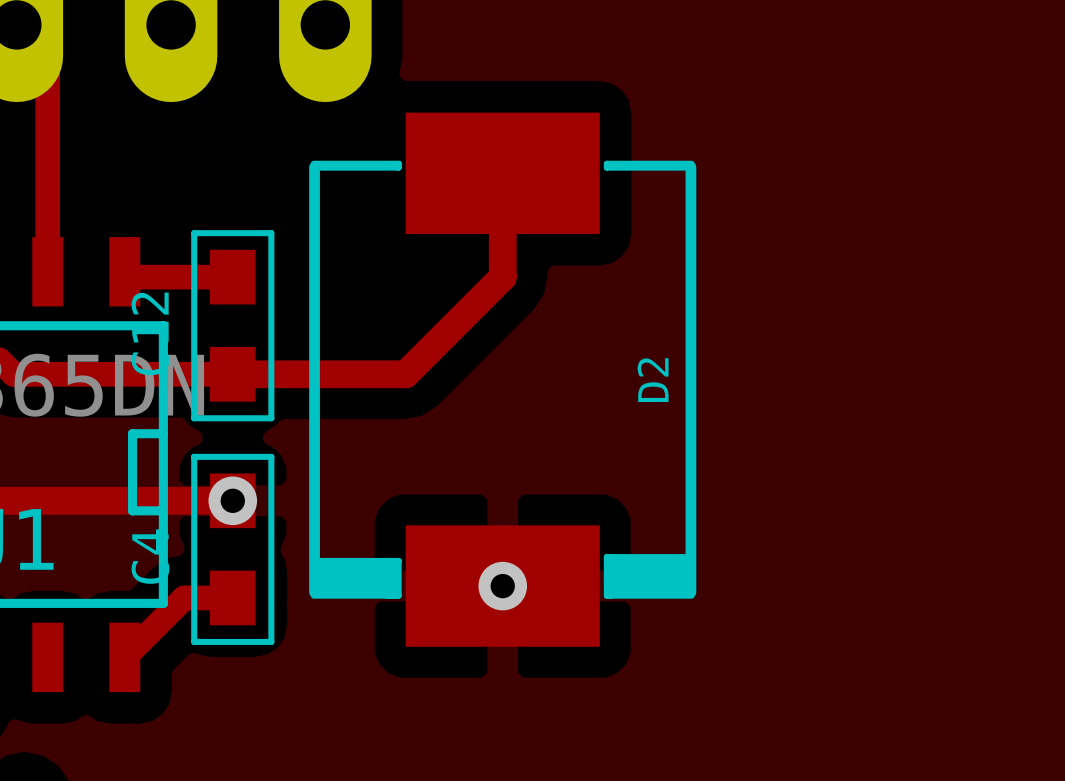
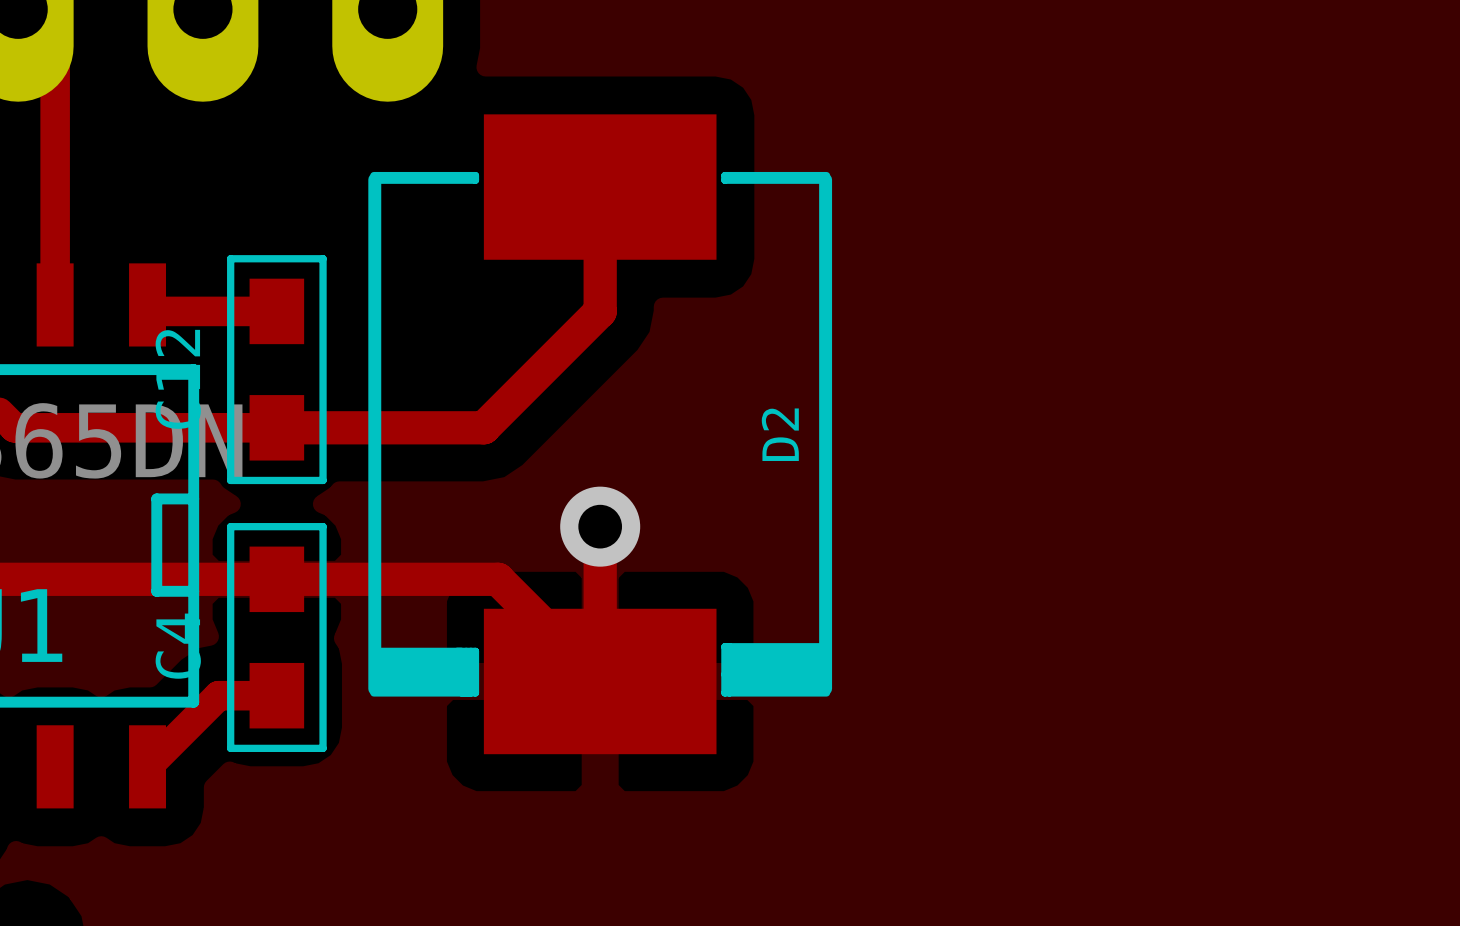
track: none -> (600, 526) (600, 681) (498, 579) (276, 579)
via: none -> (600, 526)
via: (232, 500) -> none
via: (502, 586) -> none

